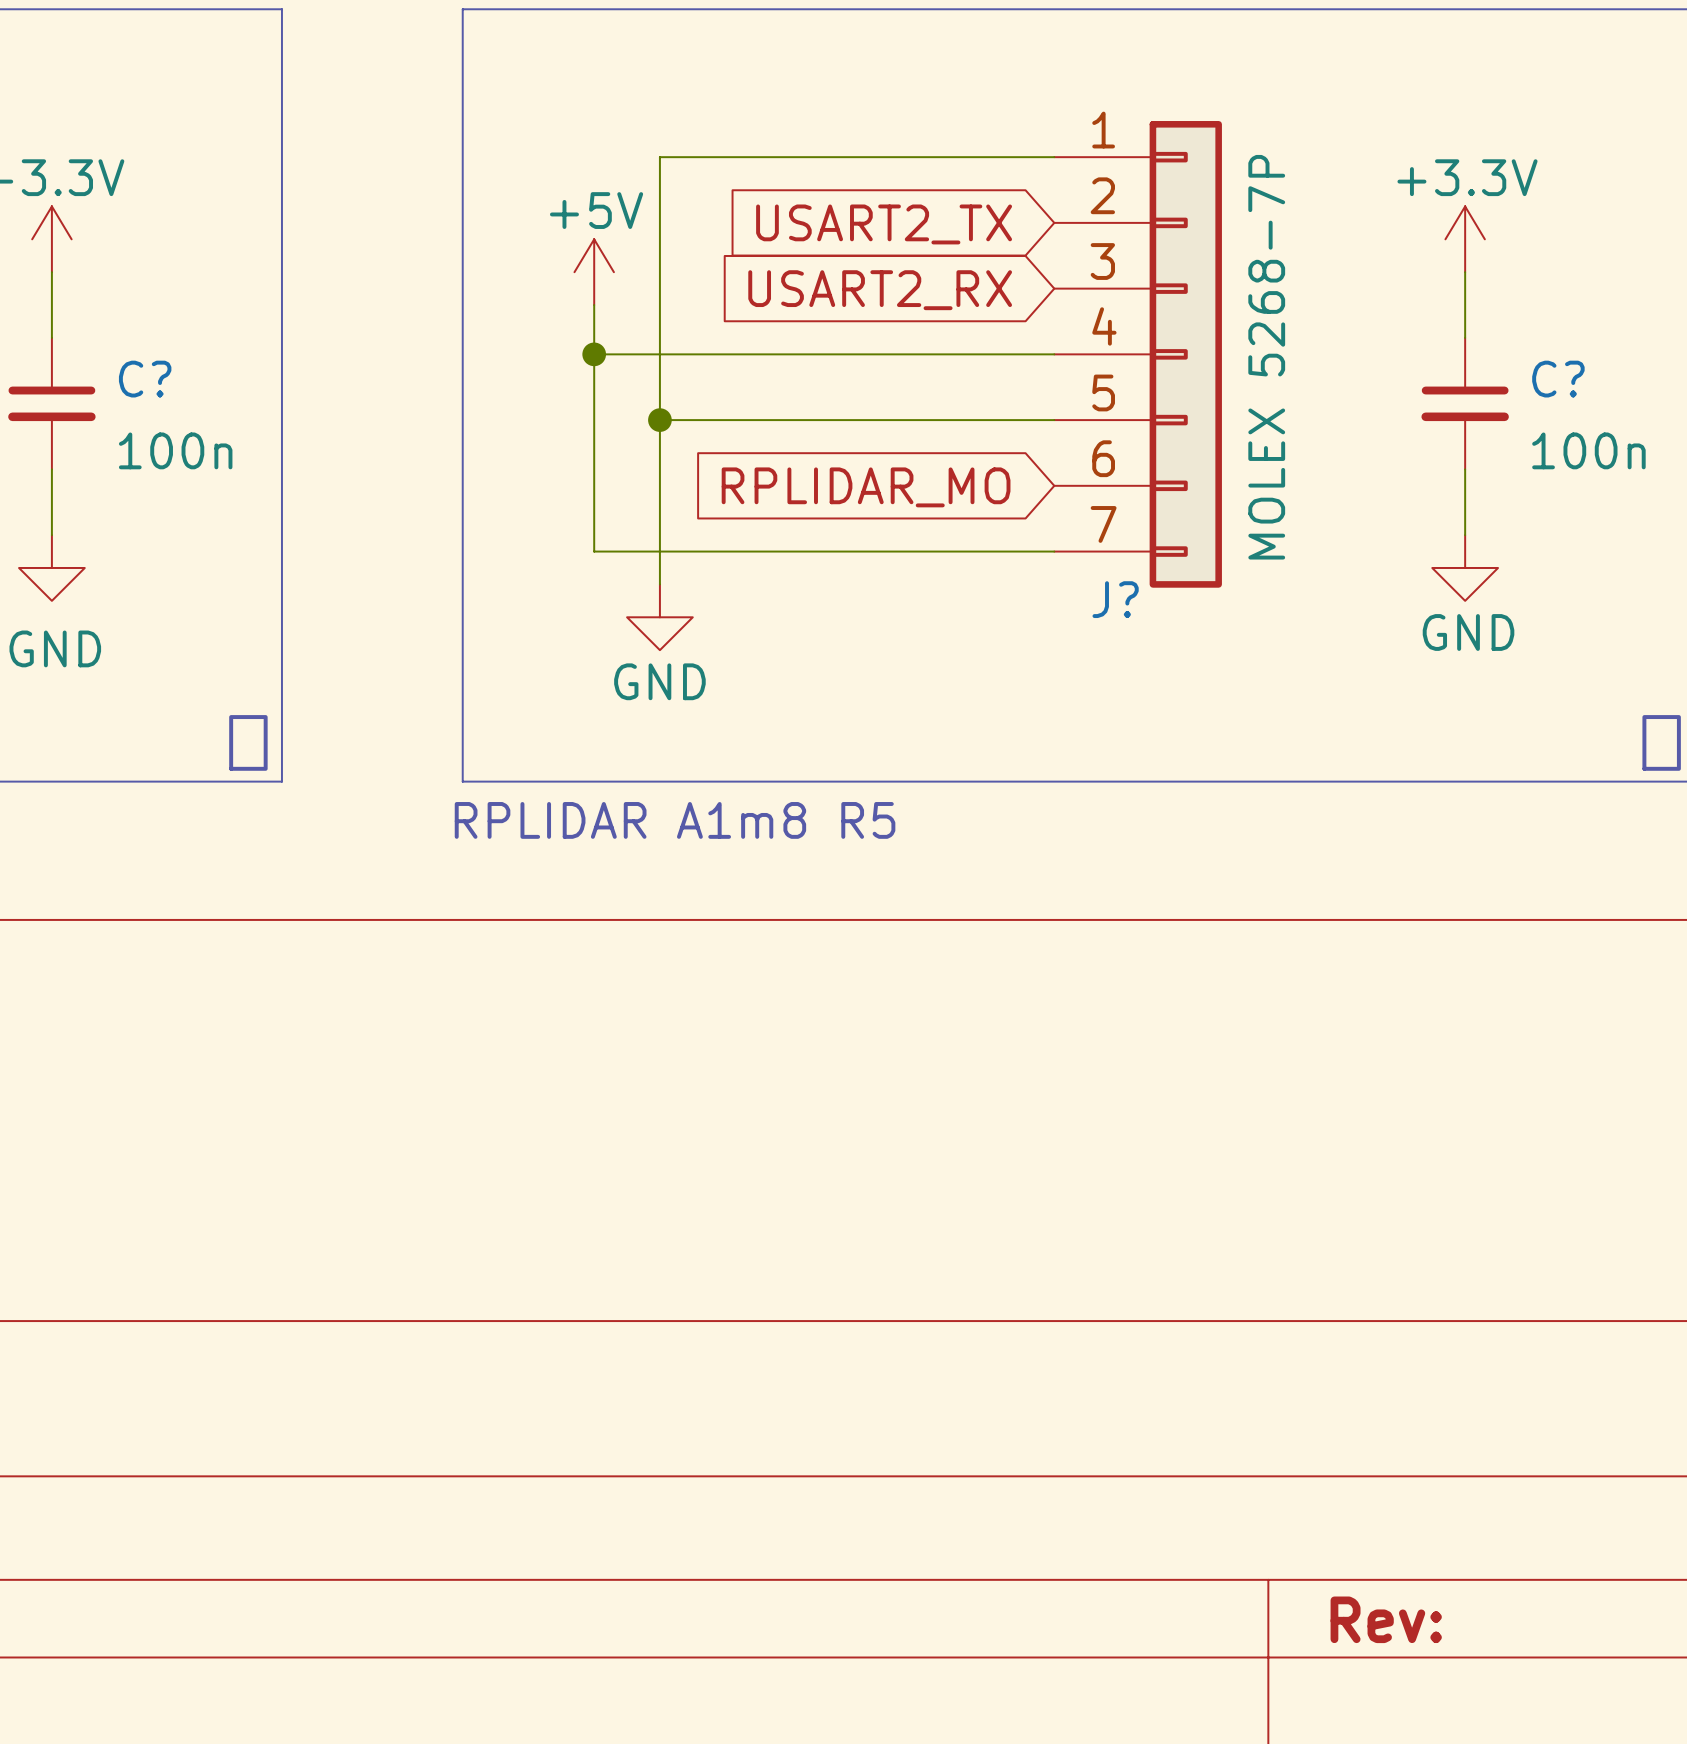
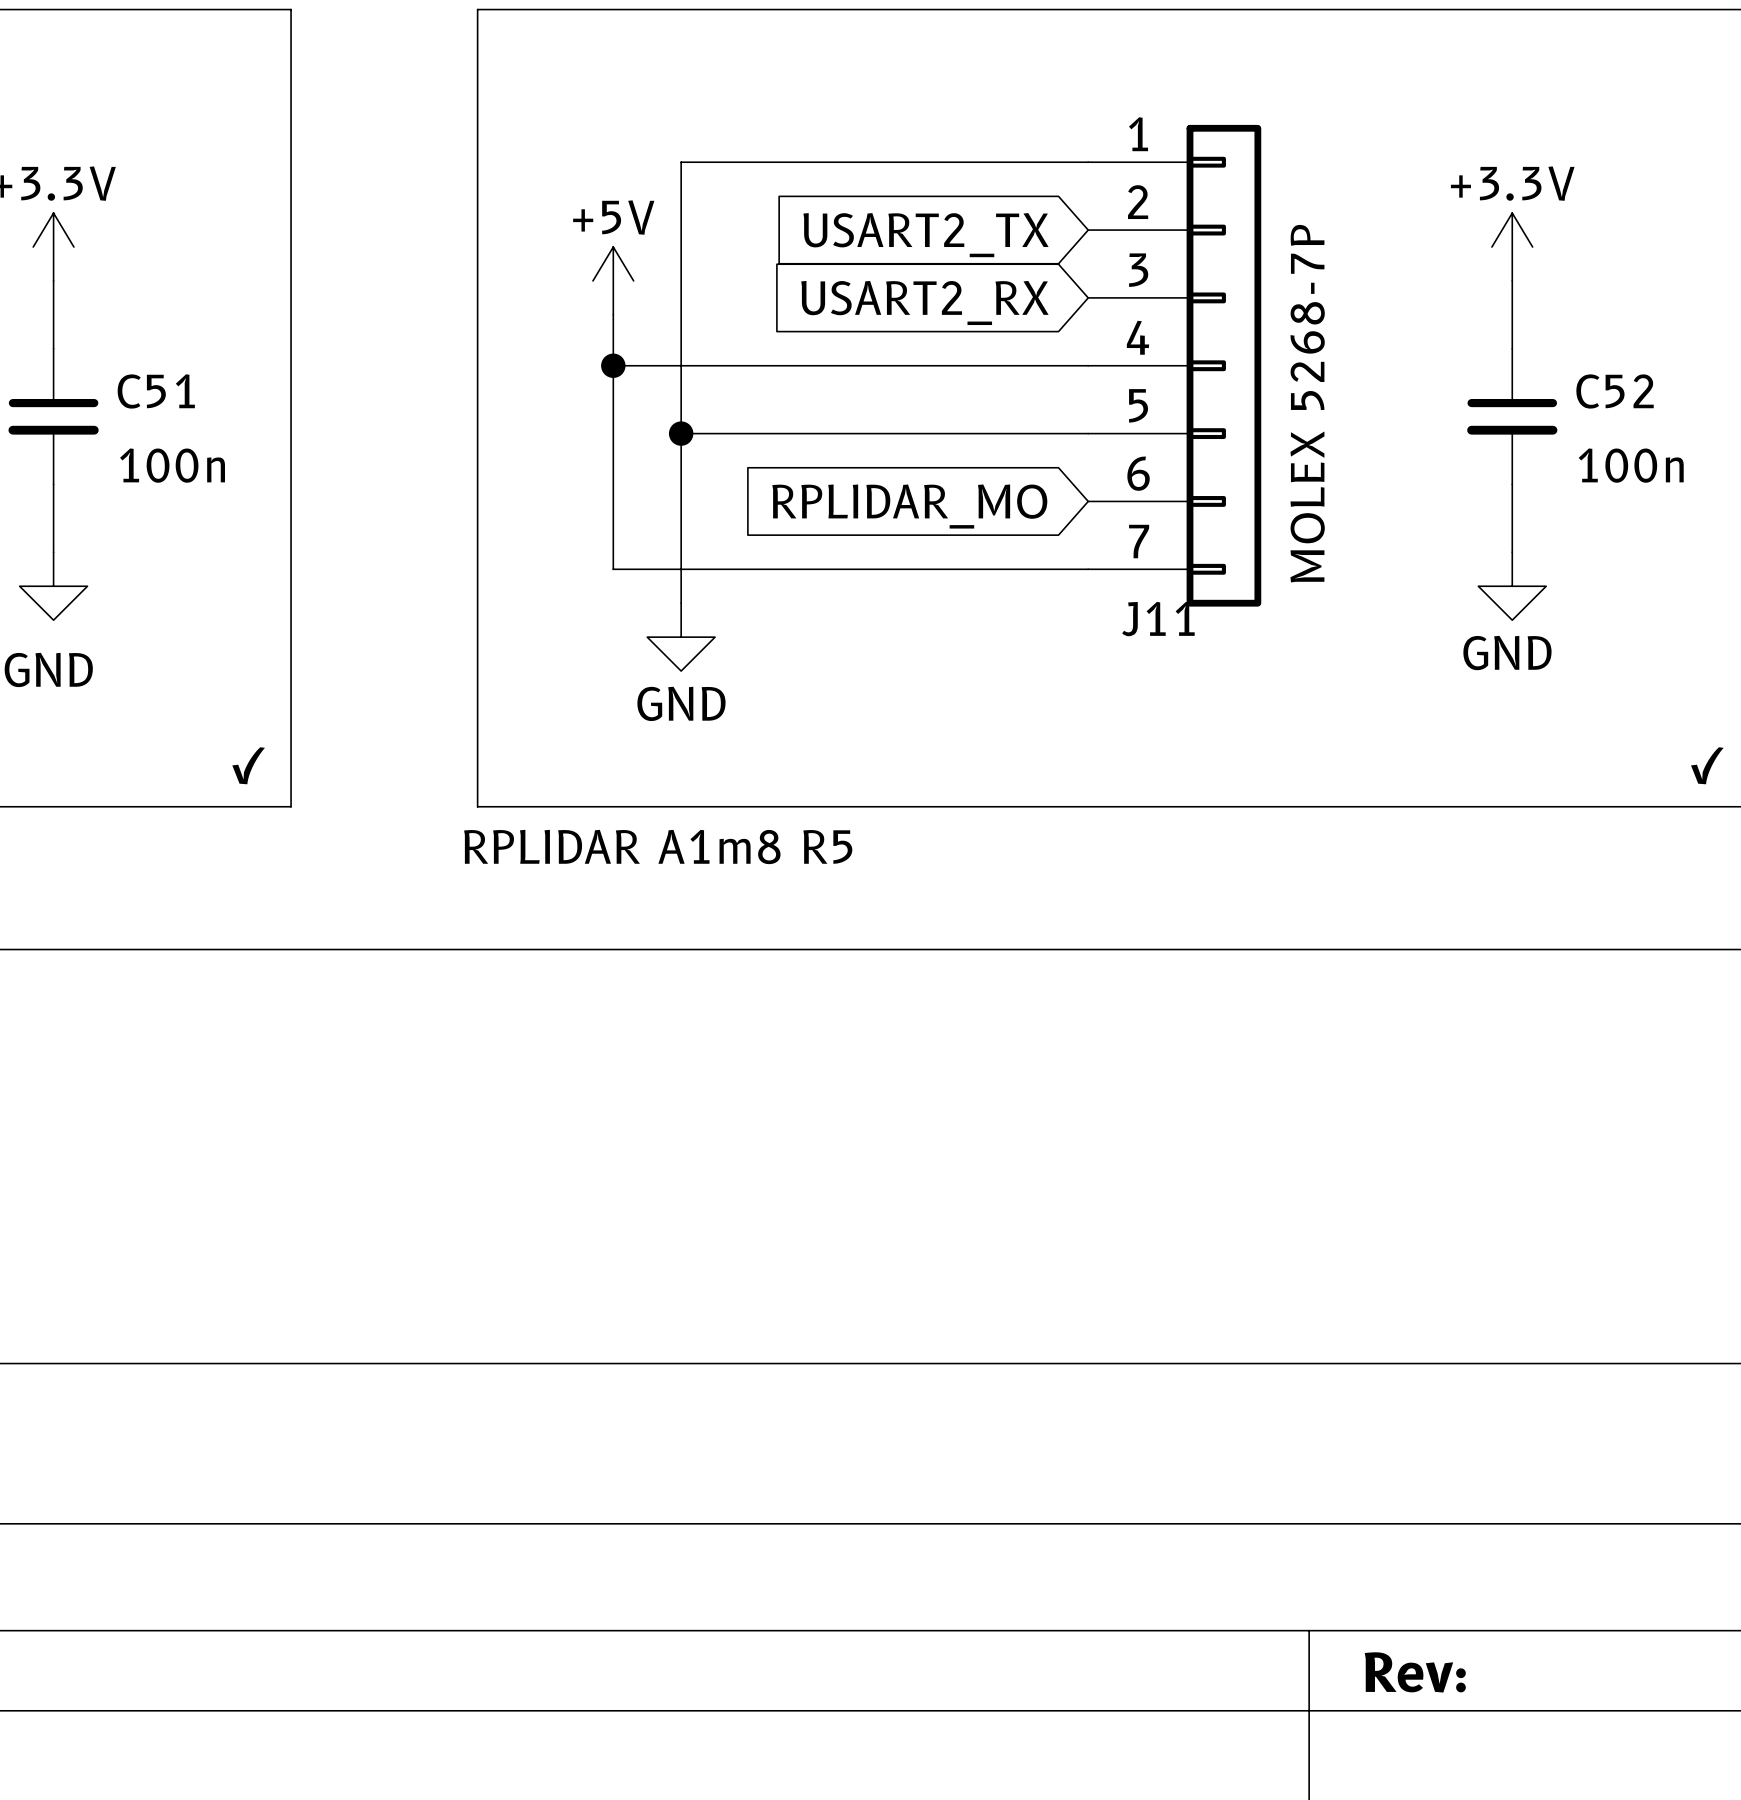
C? name: C? (145, 379) -> C51 (156, 391)
C? name: C? (1558, 379) -> C52 (1615, 391)
J? name: J? (1115, 599) -> J11 (1158, 619)

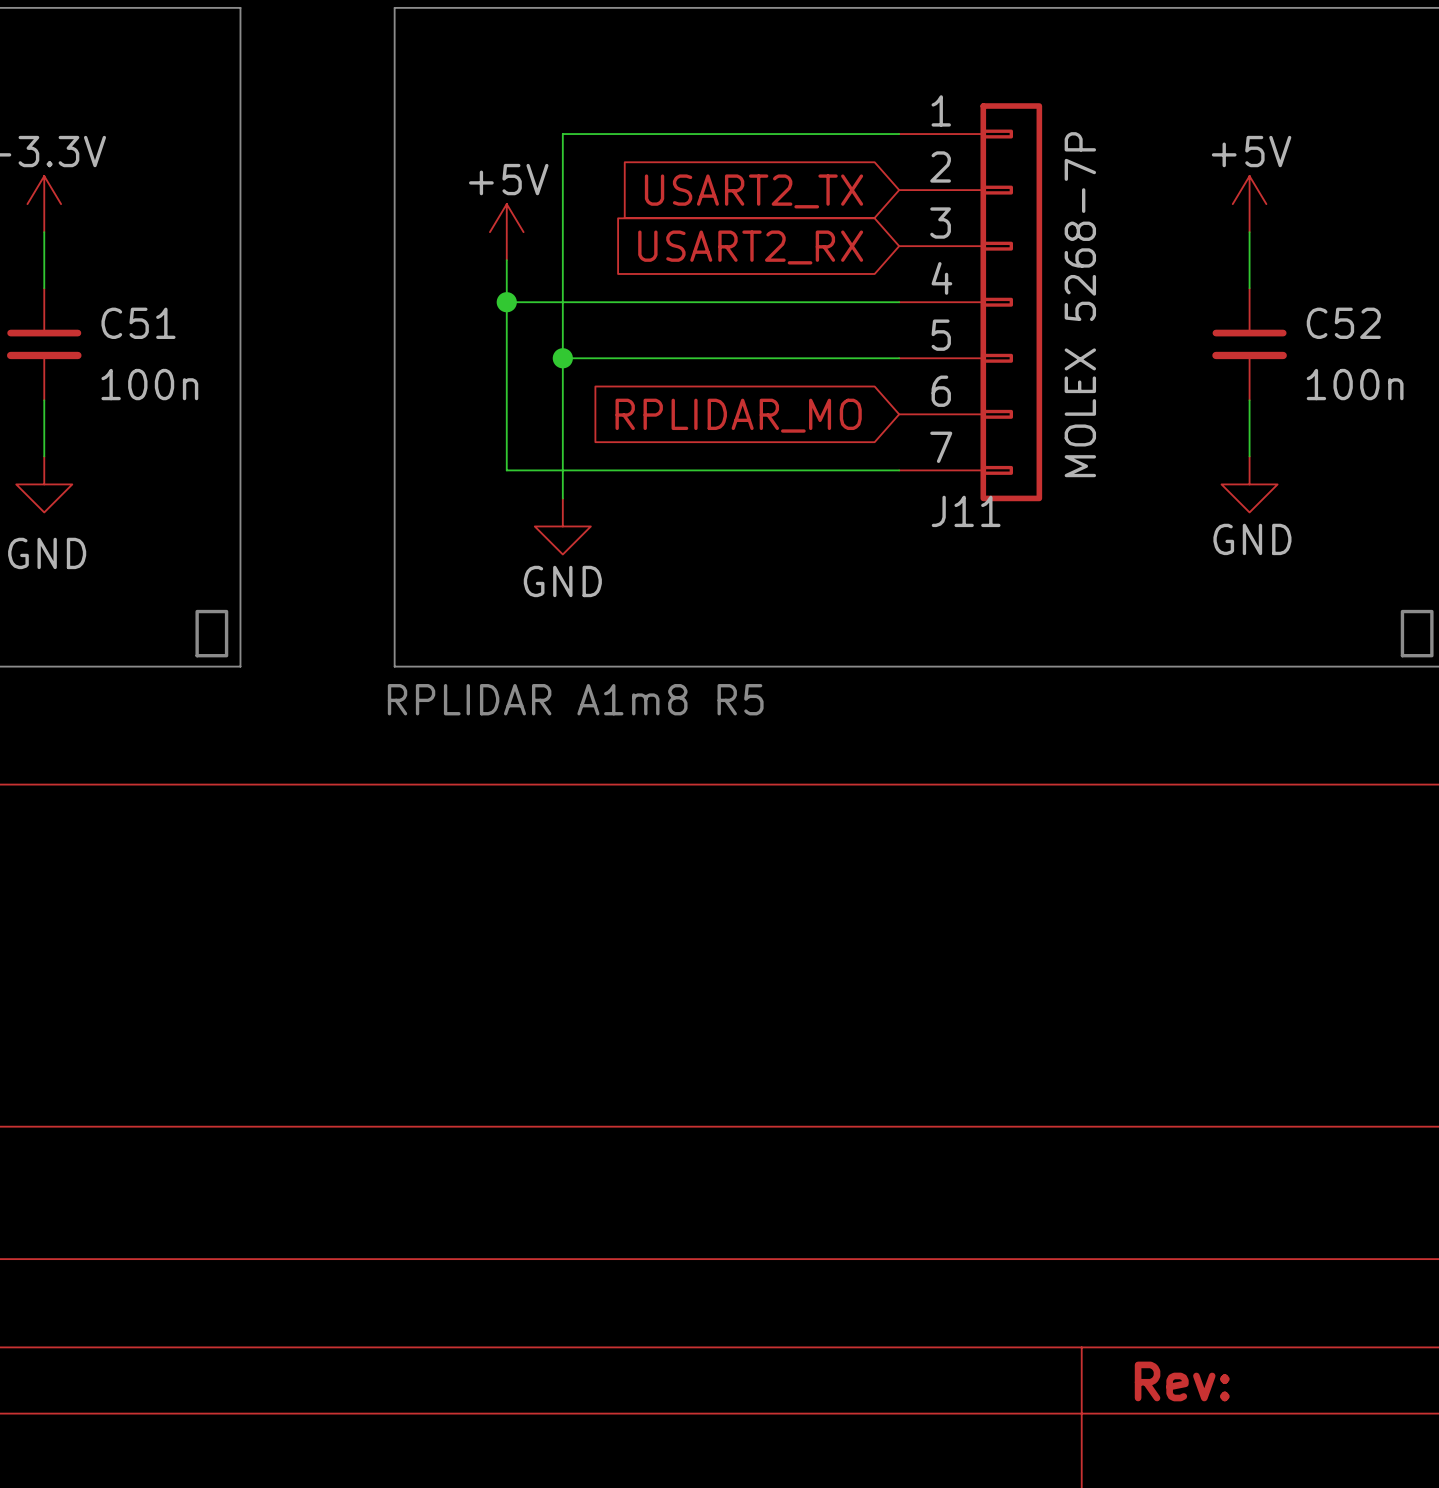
power symbol: +3.3V (1512, 247) -> +5V (1249, 204)

